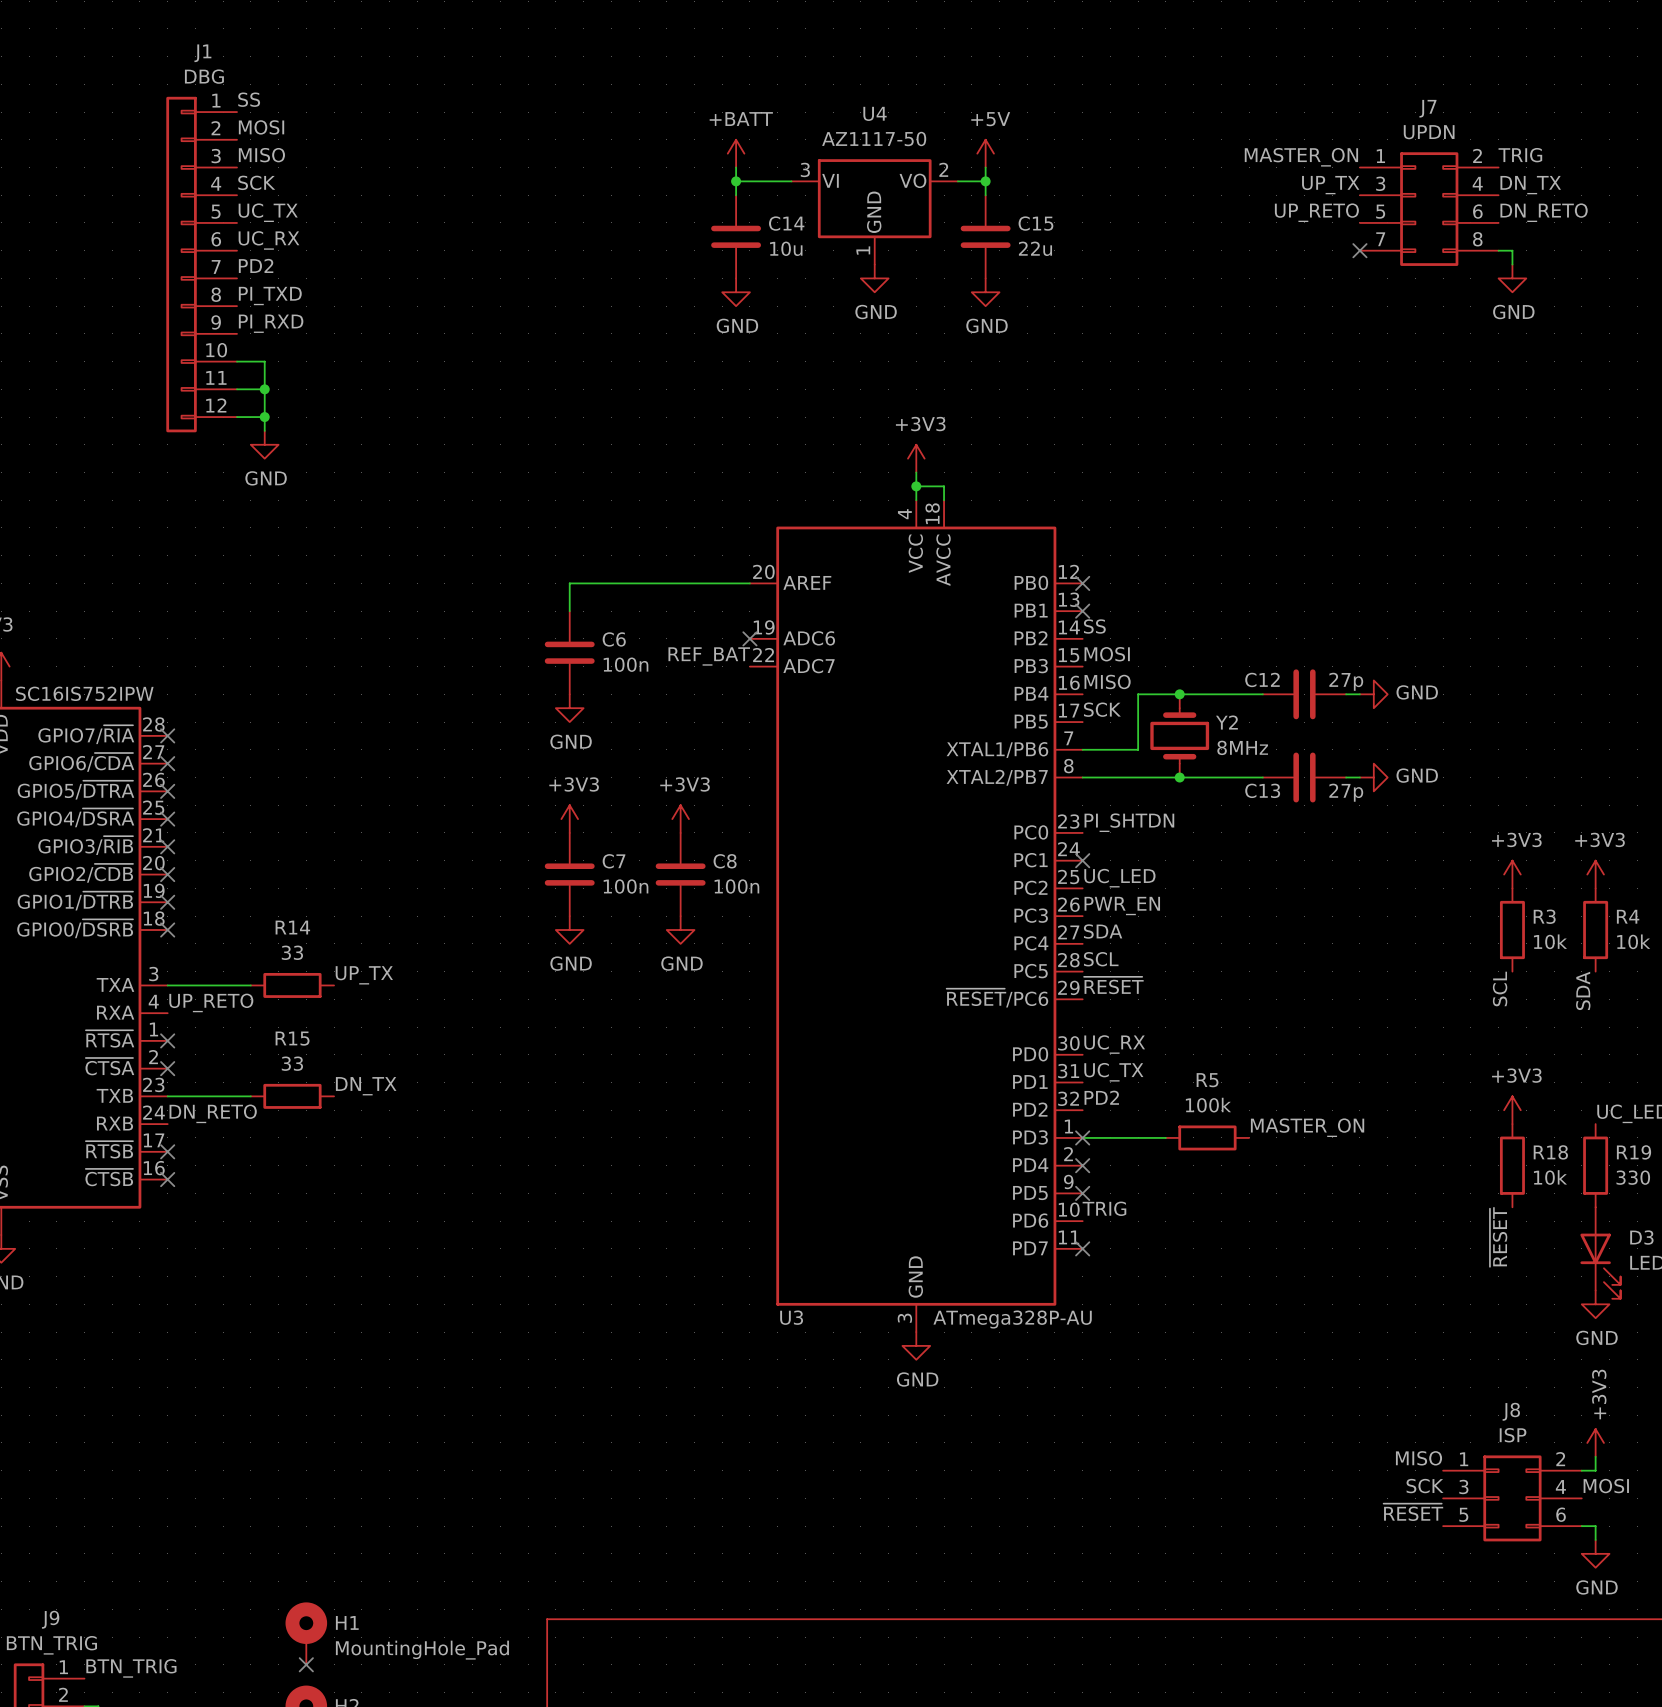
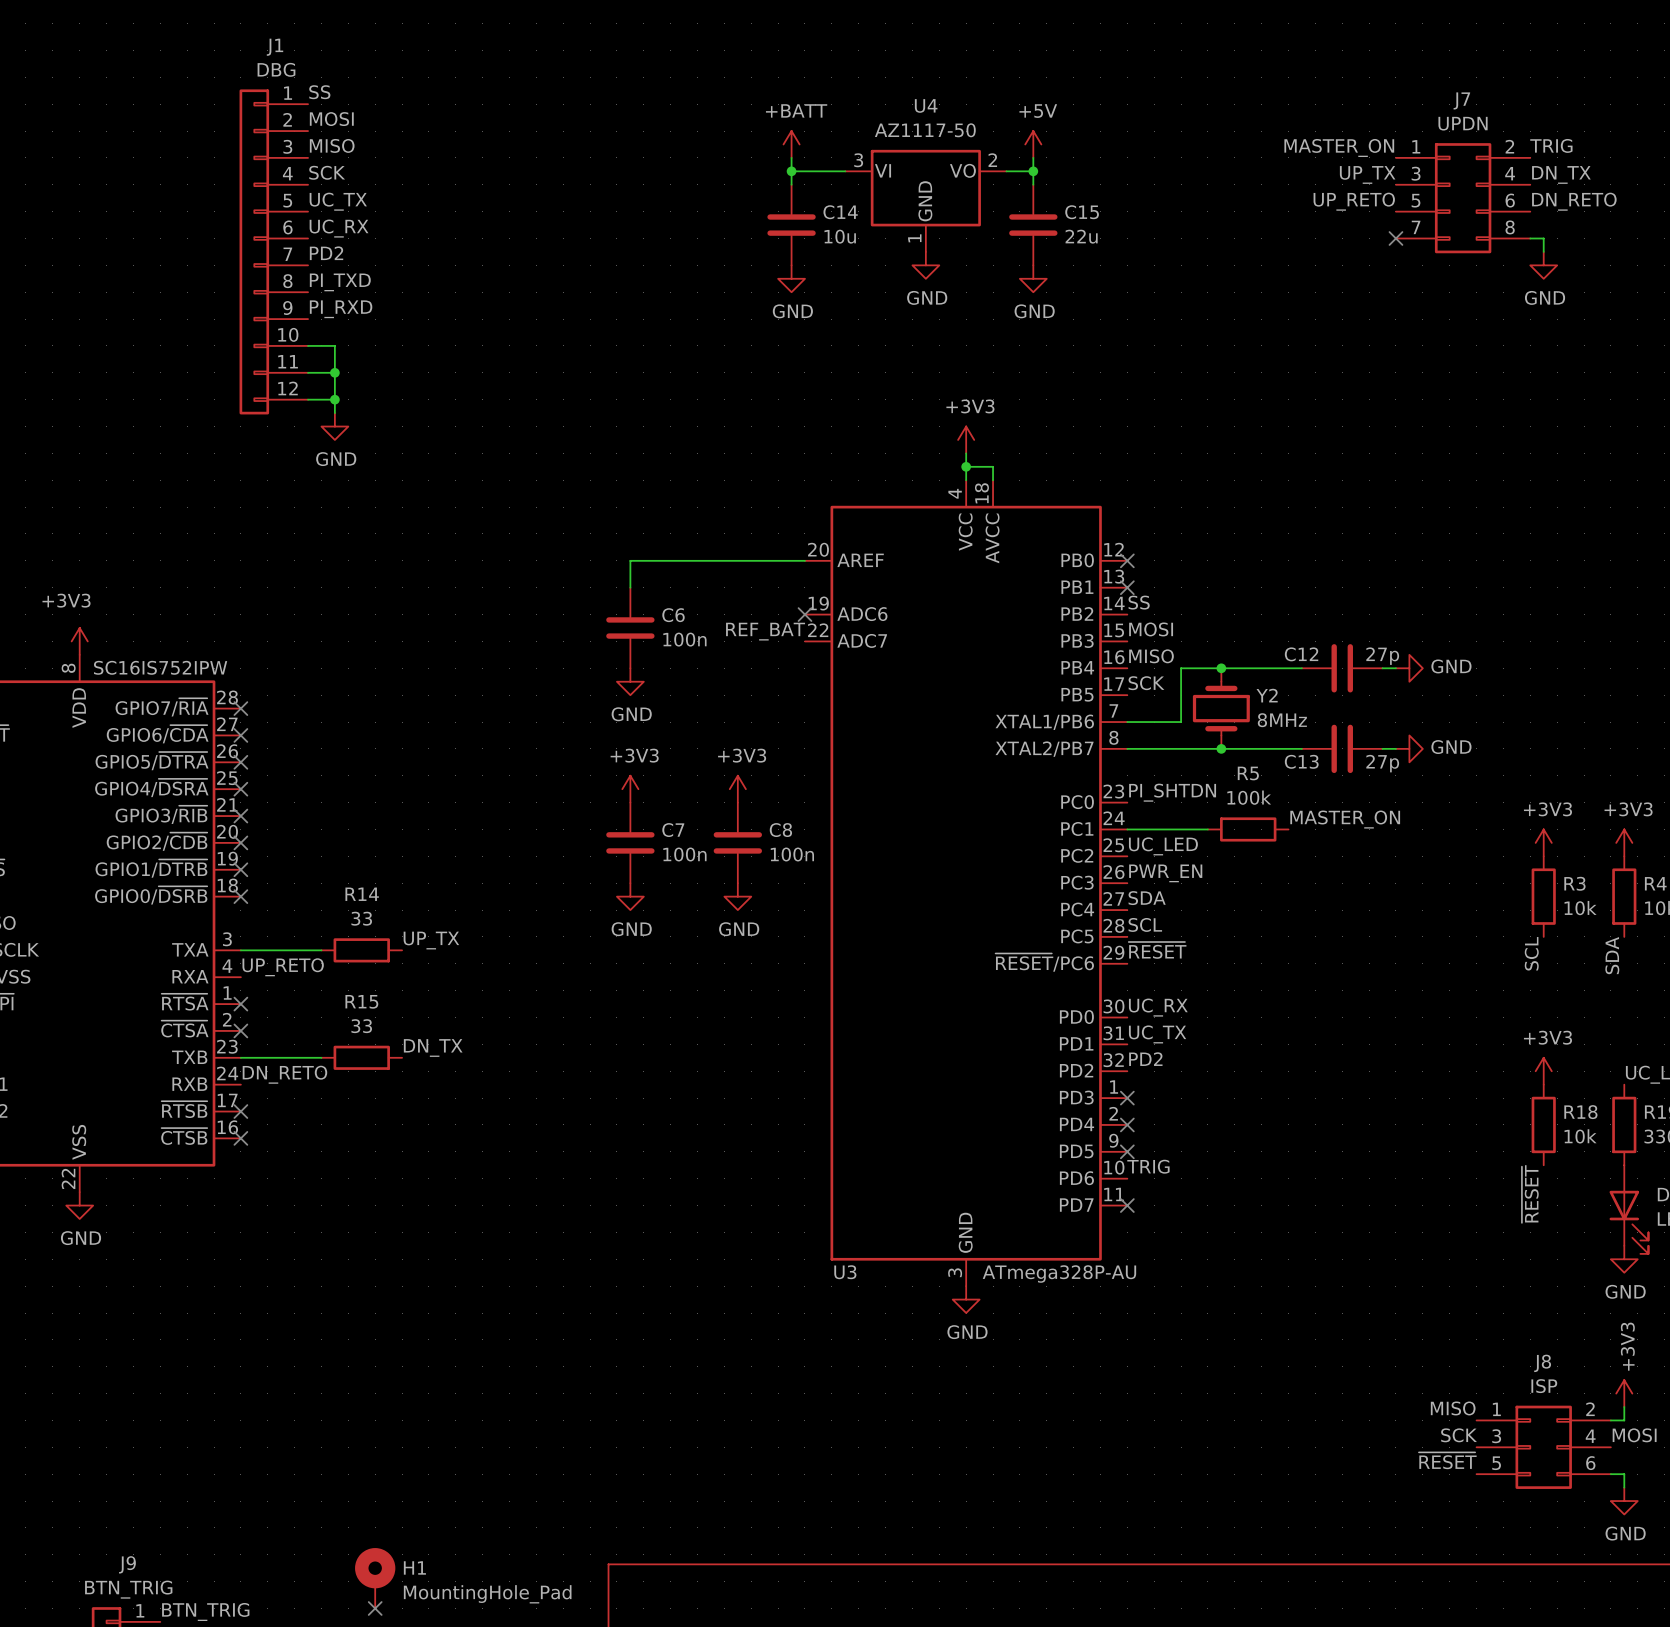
label: none -> MASTER_ON (1345, 819)
wire: none -> (1127, 829) (1207, 829)
no-connect mark: (1082, 860) -> none
label: MASTER_ON (1307, 1127) -> none
wire: (1082, 1137) (1165, 1137) -> none
R5 position: (1207, 1137) -> (1248, 829)

